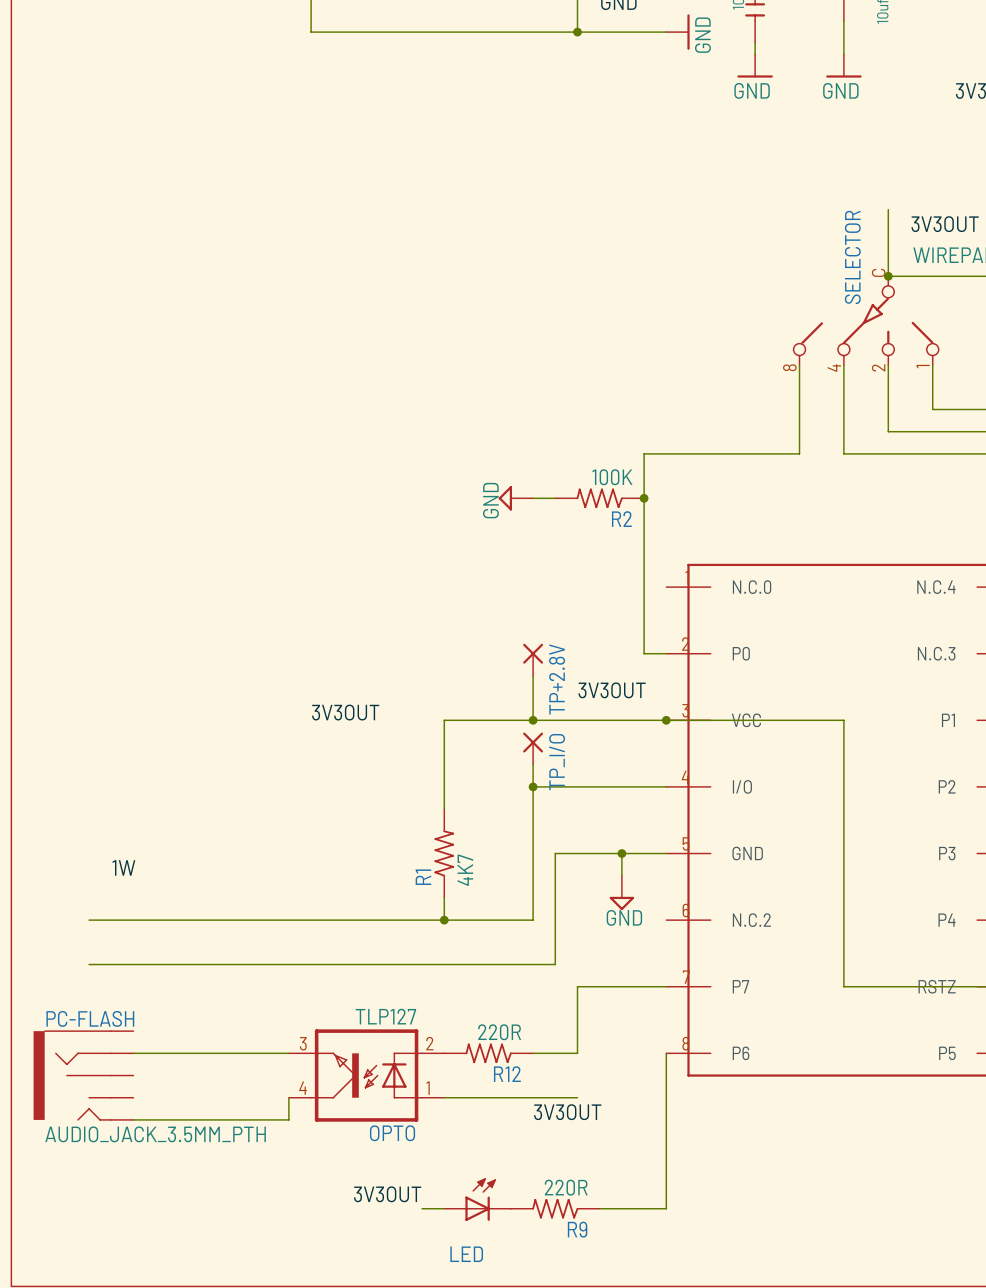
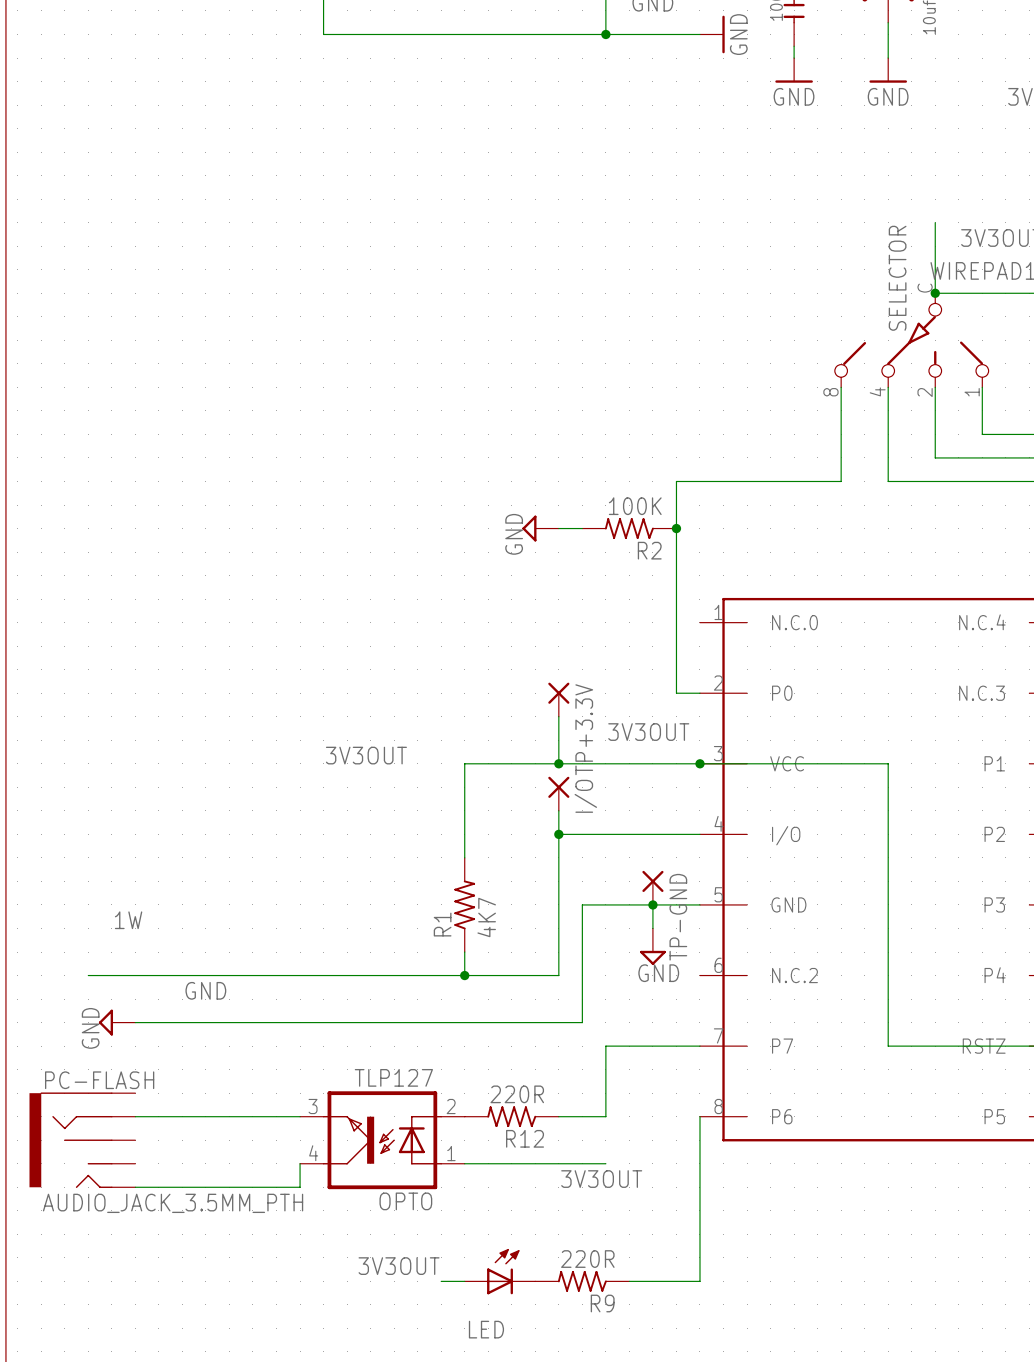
TP+2.8V name: TP+2.8V (557, 679) -> TP+3.3V (584, 729)
TP_I/O name: TP_I/O (557, 762) -> I/O (585, 796)
TP-GND: none -> (652, 887)
label: none -> GND (205, 990)
power symbol: none -> GND (117, 1022)

